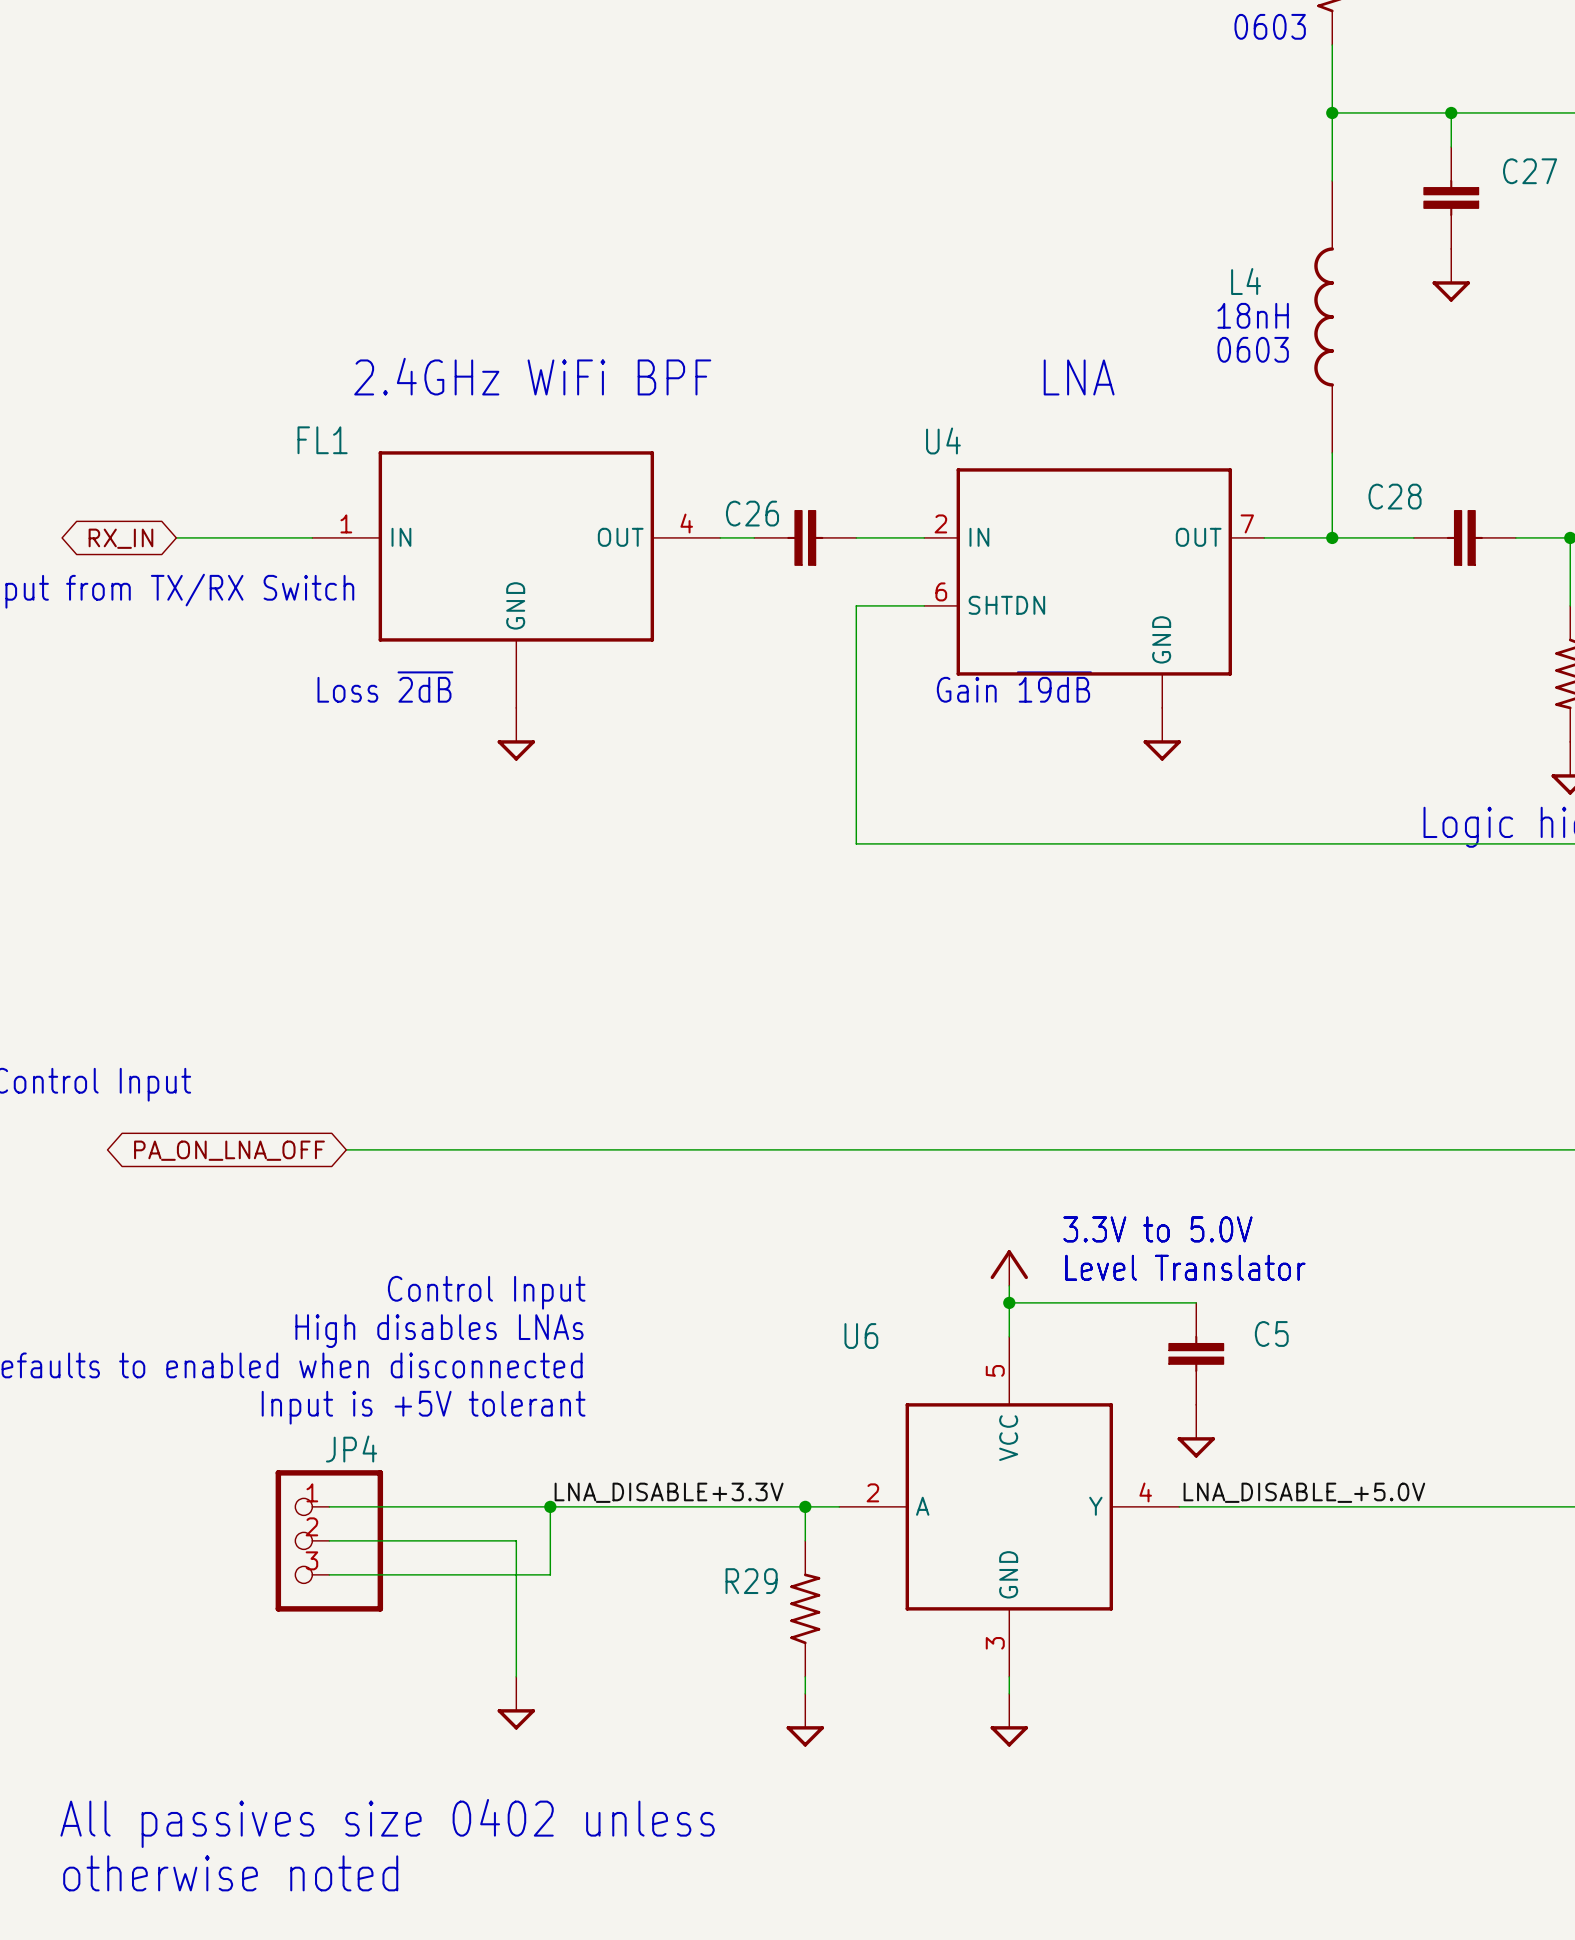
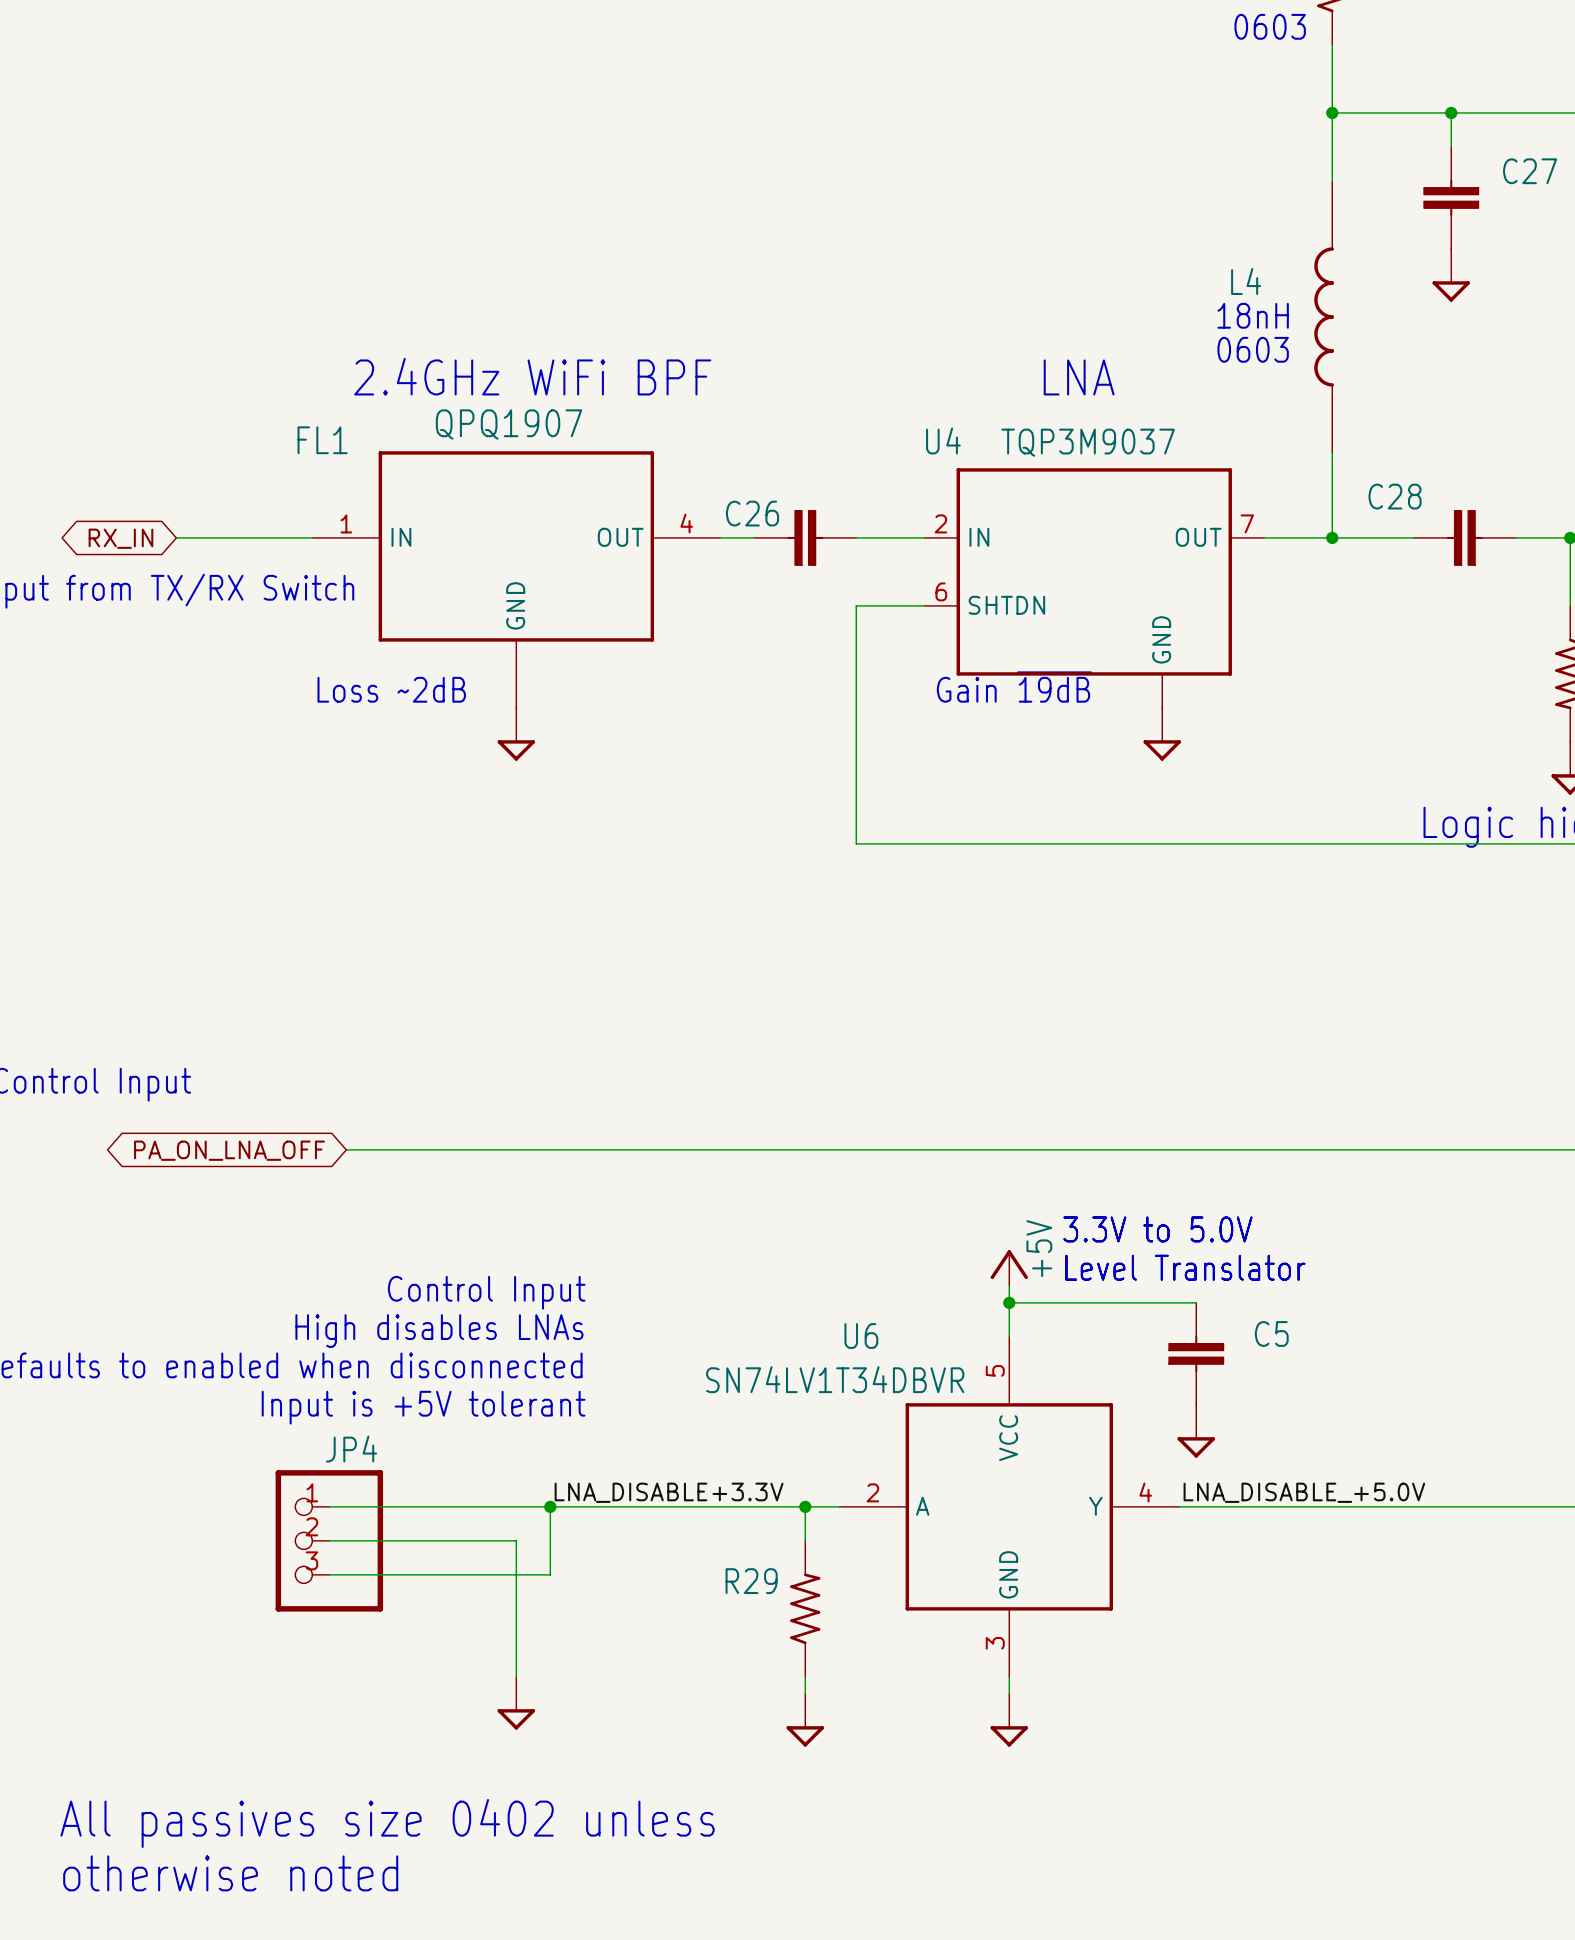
FL1 value: none -> QPQ1907 (509, 424)
U4 value: none -> TQP3M9037 (1088, 442)
text: Loss ~{2dB} (385, 687) -> Loss ~2dB (391, 689)
power symbol text: none -> +5V (1039, 1248)
U6 value: none -> SN74LV1T34DBVR (835, 1379)

